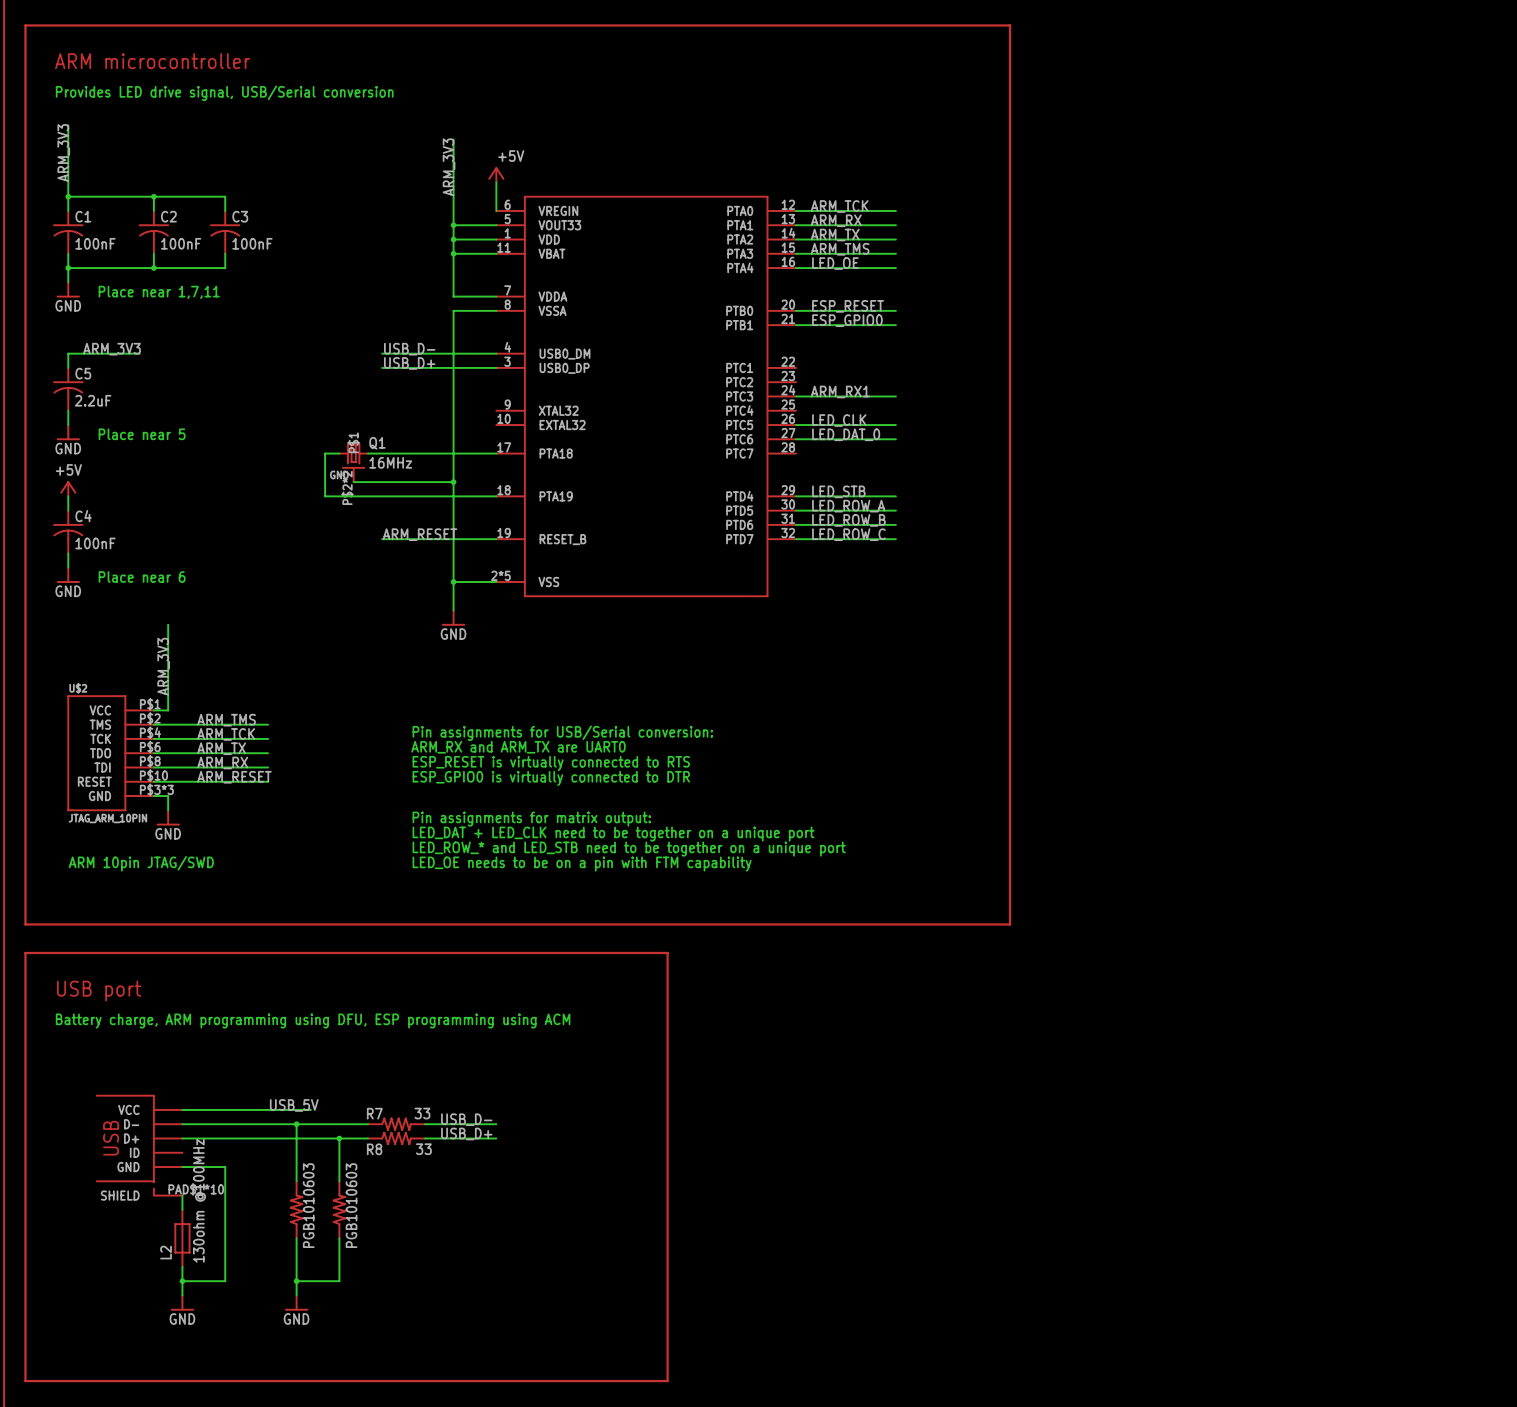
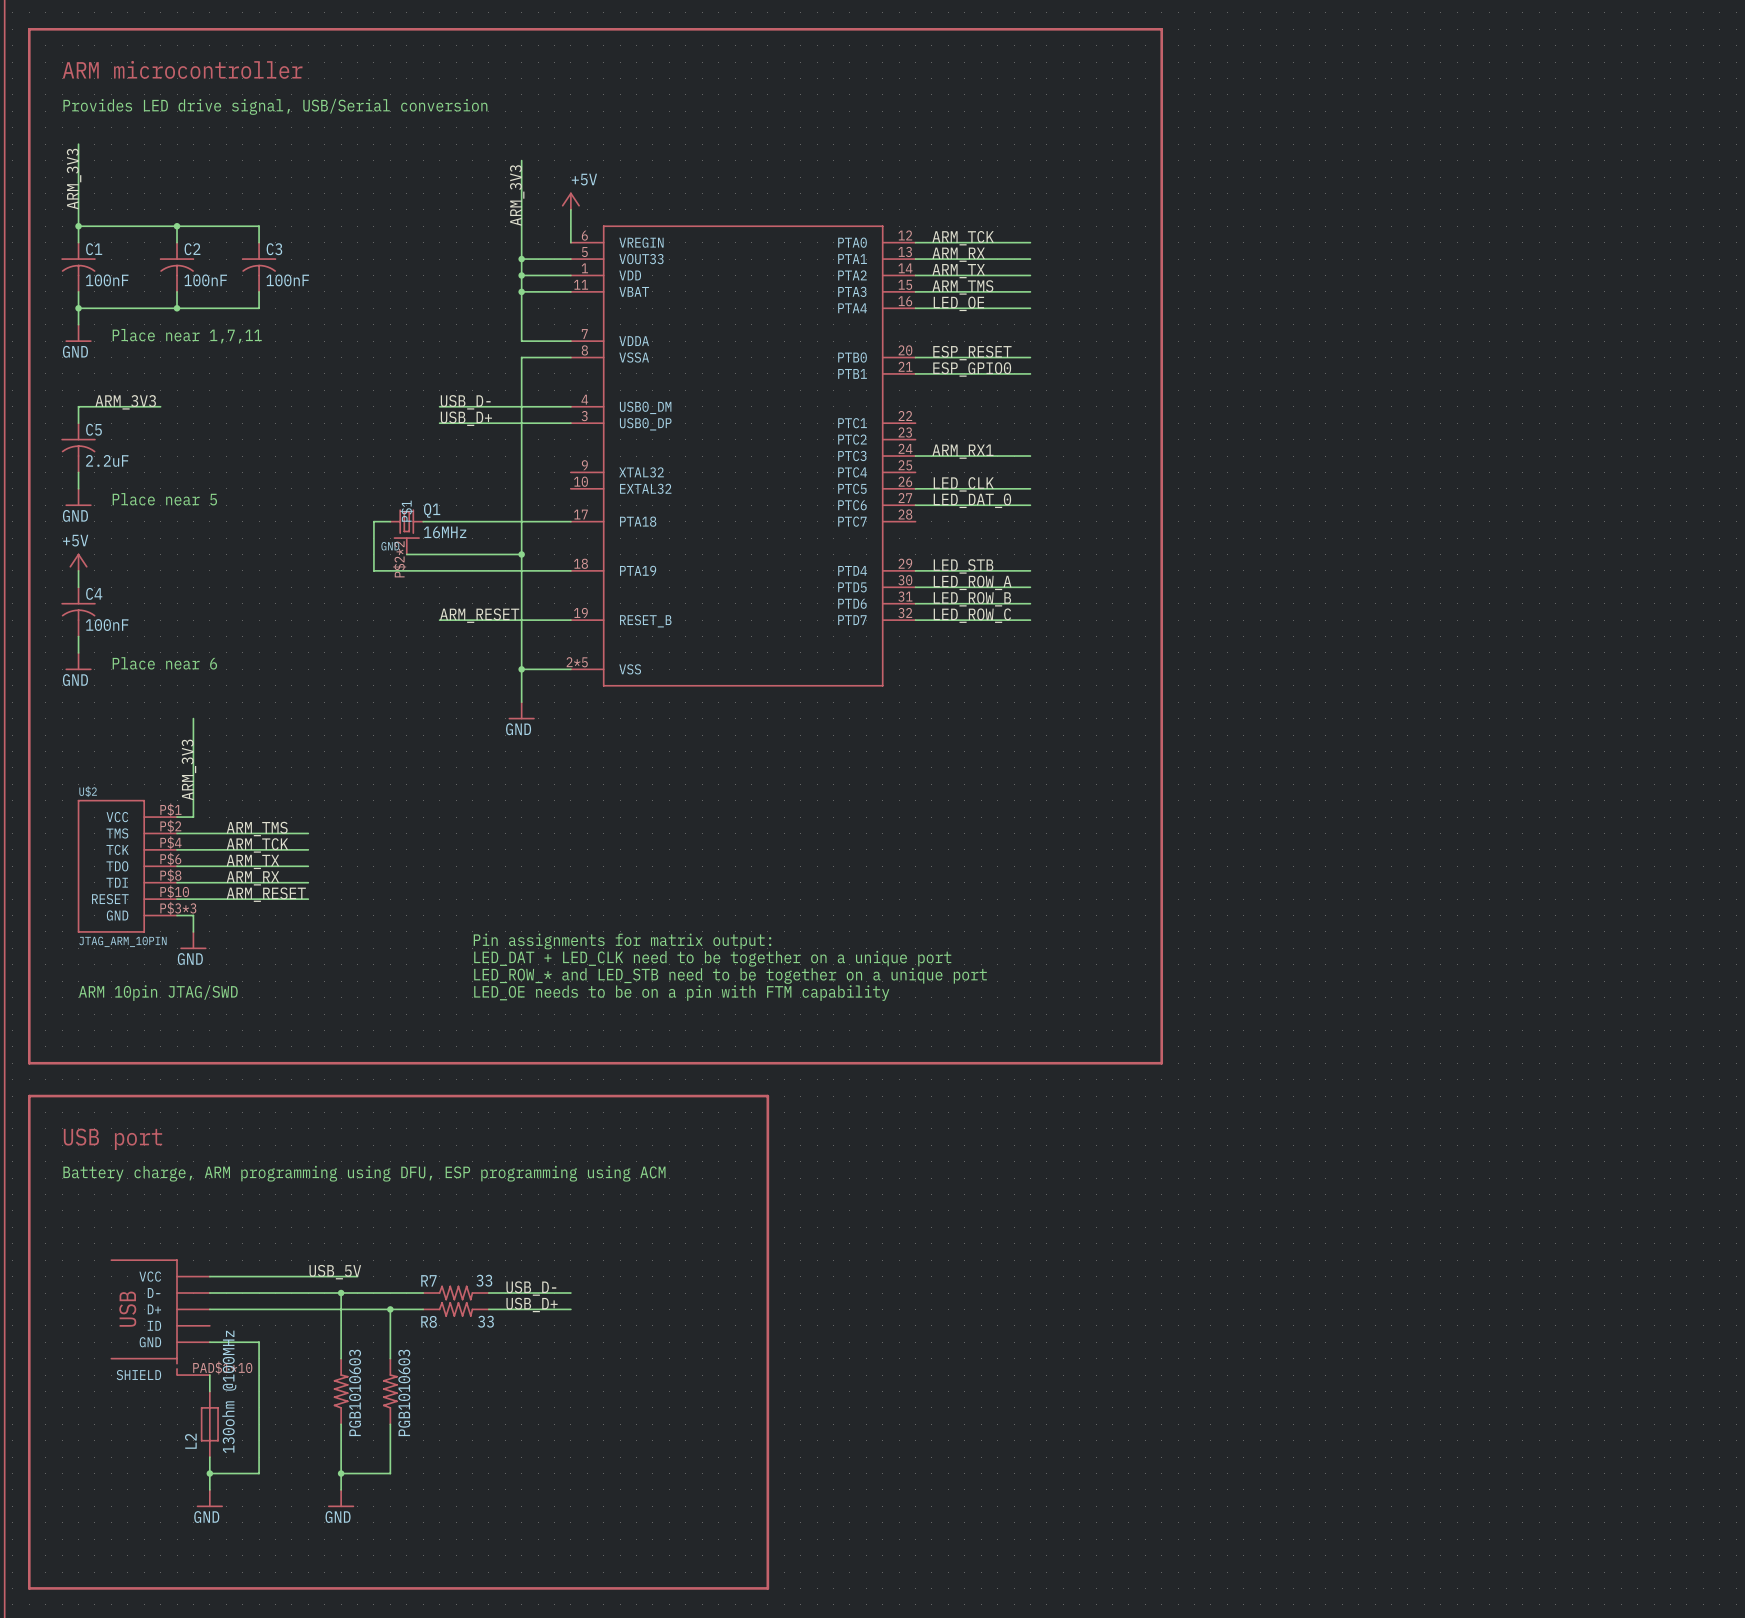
text: Pin assignments for USB/Serial conversion: (562, 733) -> none
text: ARM_RX and ARM_TX are UART0 (518, 747) -> none
text: ESP_RESET is virtually connected to RTS (551, 763) -> none
text: ESP_GPIO0 is virtually connected to DTR (551, 778) -> none

